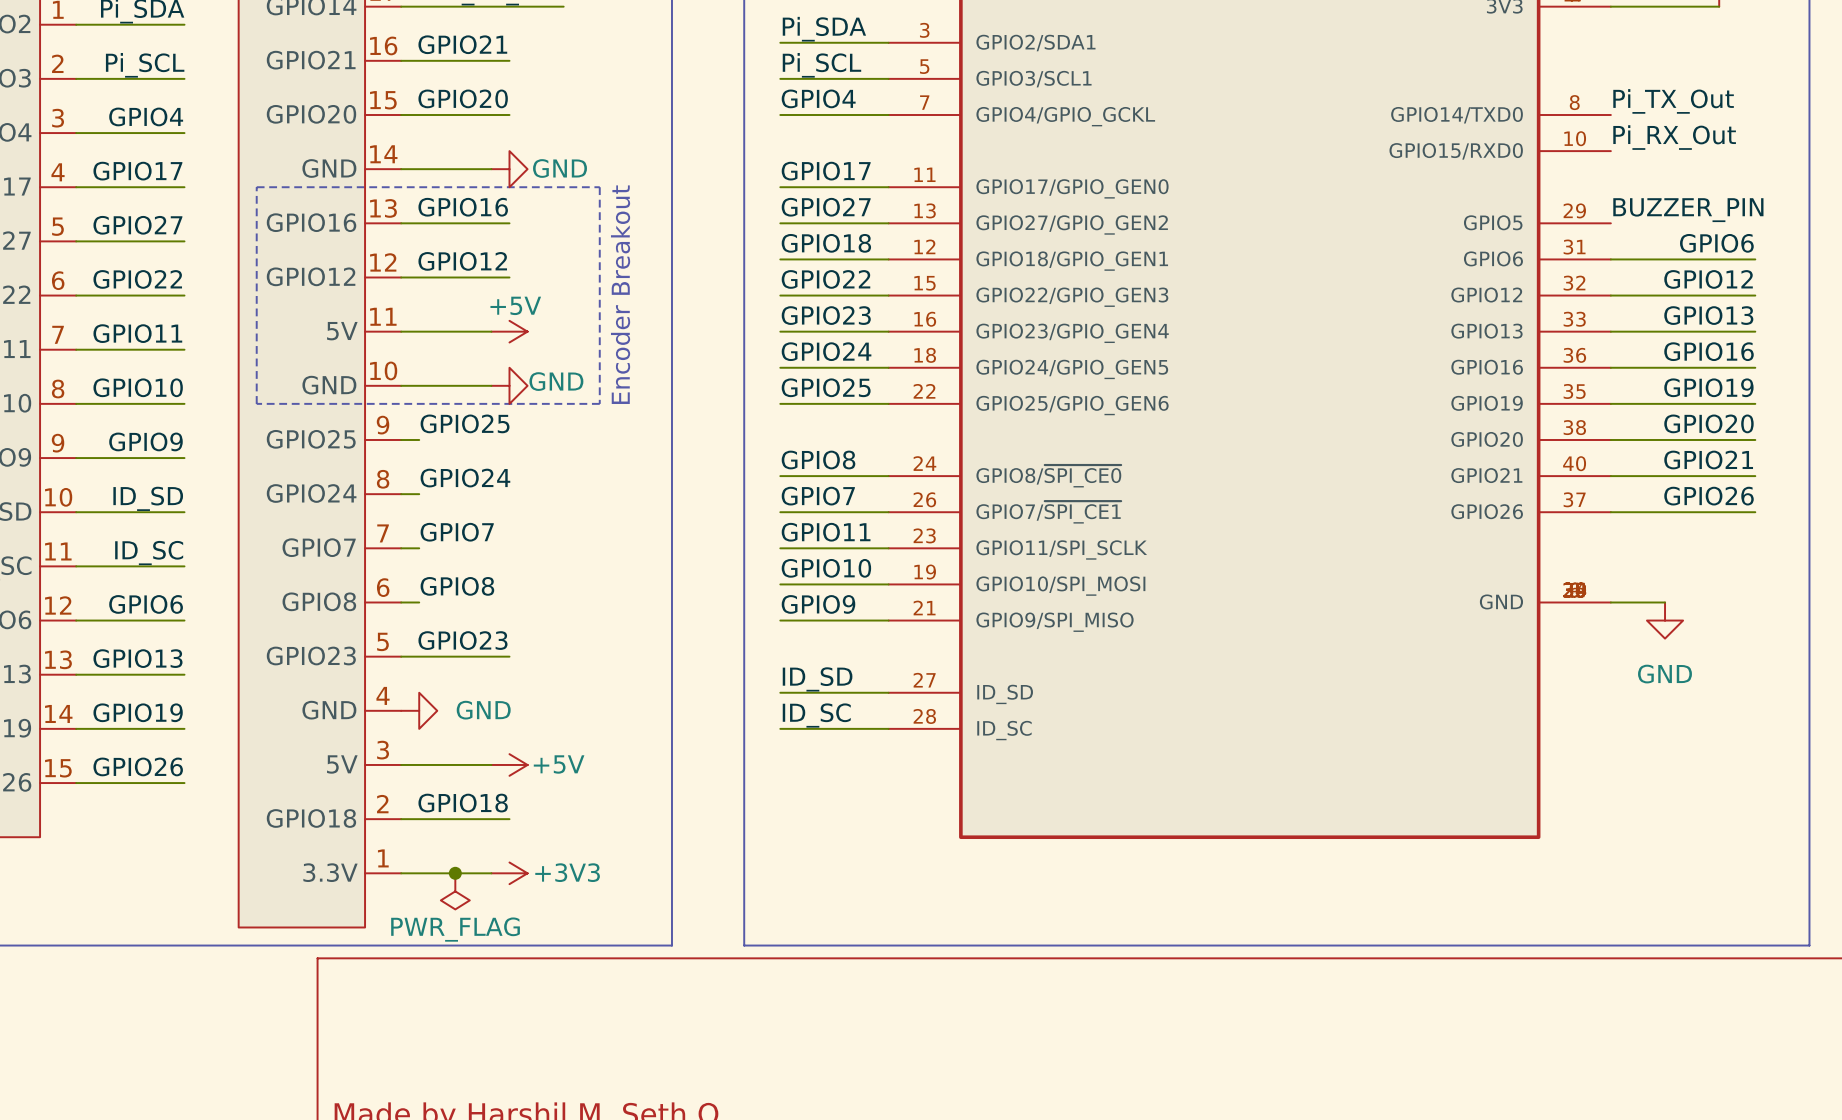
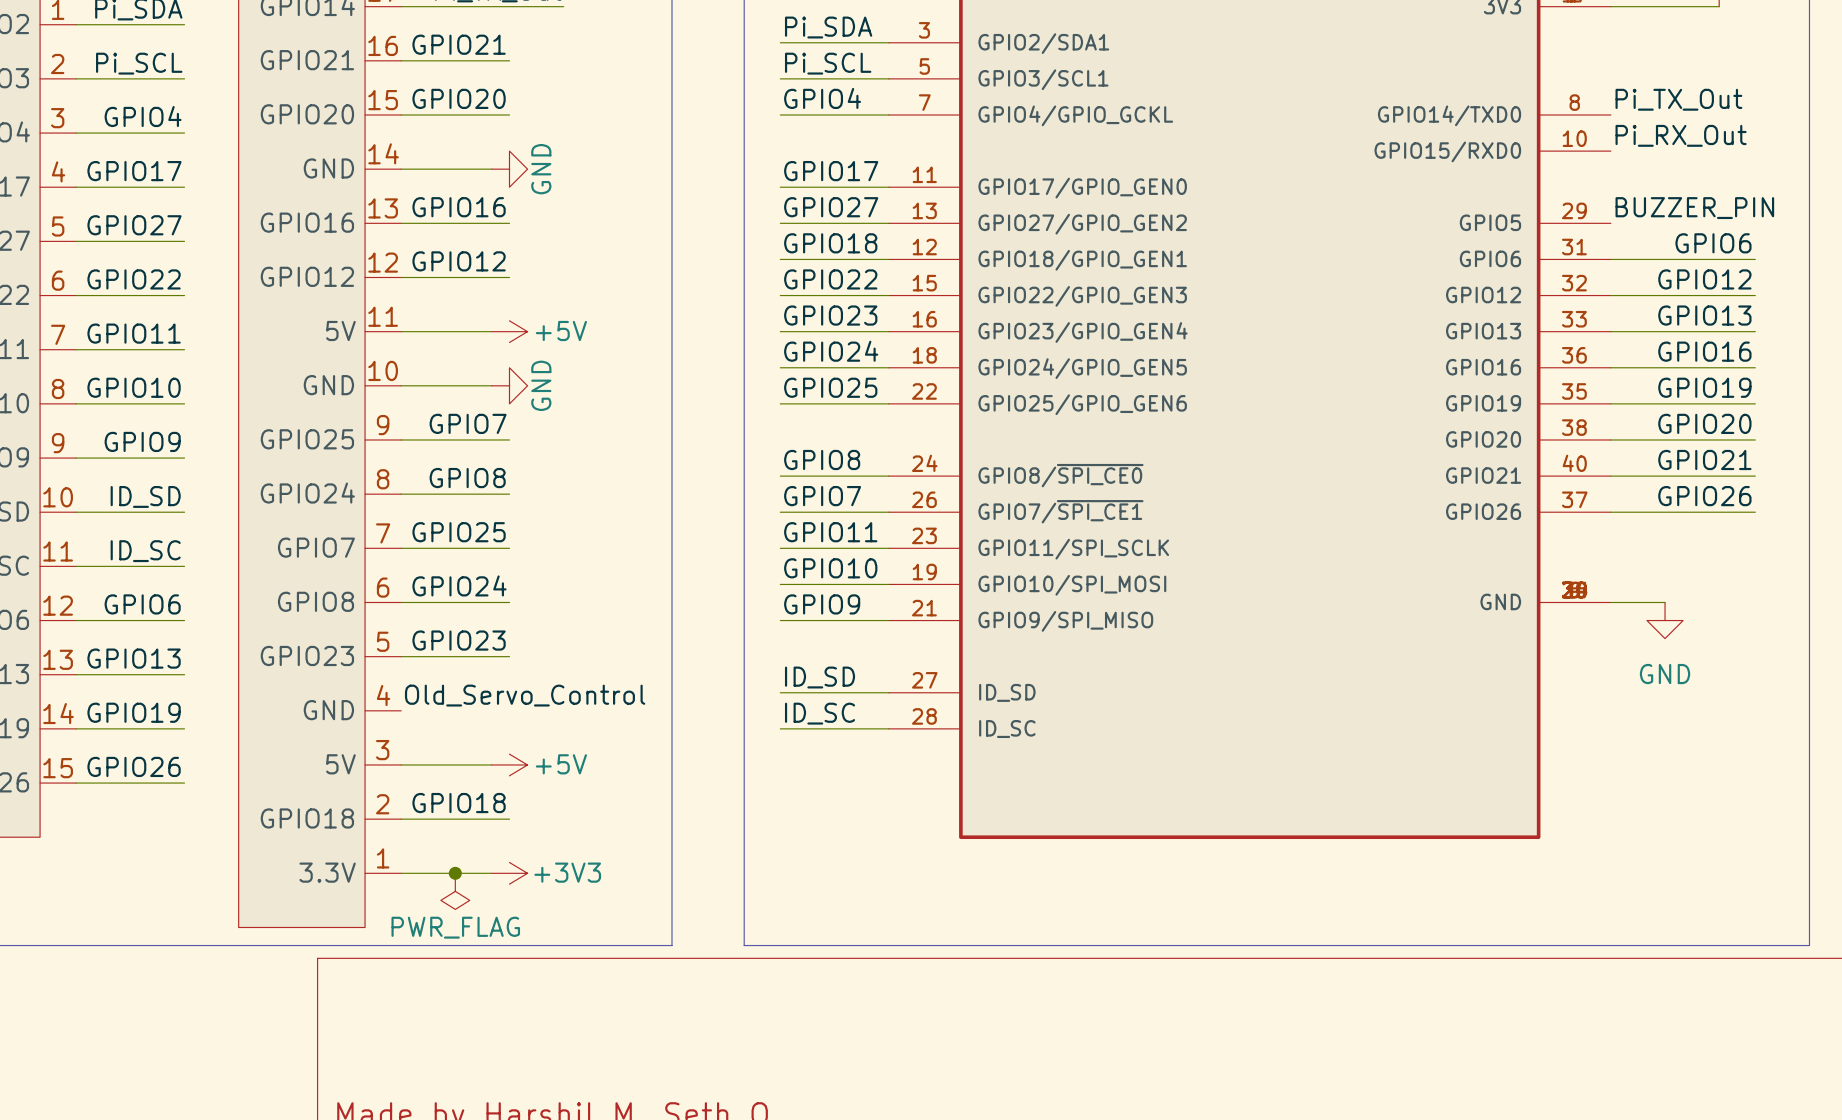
power symbol text rotation: 0° (560, 168) -> 90° counterclockwise (541, 169)
line: (256, 187) (599, 187) (599, 403) (256, 403) (256, 187) -> none
text: Encoder Breakout (620, 294) -> none
power symbol text position: +5V (515, 305) -> +5V (561, 330)
power symbol text rotation: 0° (556, 381) -> 90° counterclockwise (541, 385)
label position: GPIO25 (465, 423) -> GPIO25 (459, 532)
wire: none -> (419, 439) (509, 439)
label position: GPIO24 (465, 478) -> GPIO24 (459, 585)
wire: none -> (419, 494) (509, 494)
label position: GPIO7 (457, 532) -> GPIO7 (468, 423)
wire: none -> (419, 548) (509, 548)
label position: GPIO8 (457, 586) -> GPIO8 (467, 478)
wire: none -> (419, 602) (509, 602)
label: none -> Old_Servo_Control (525, 695)
power symbol: GND (419, 710) -> none

